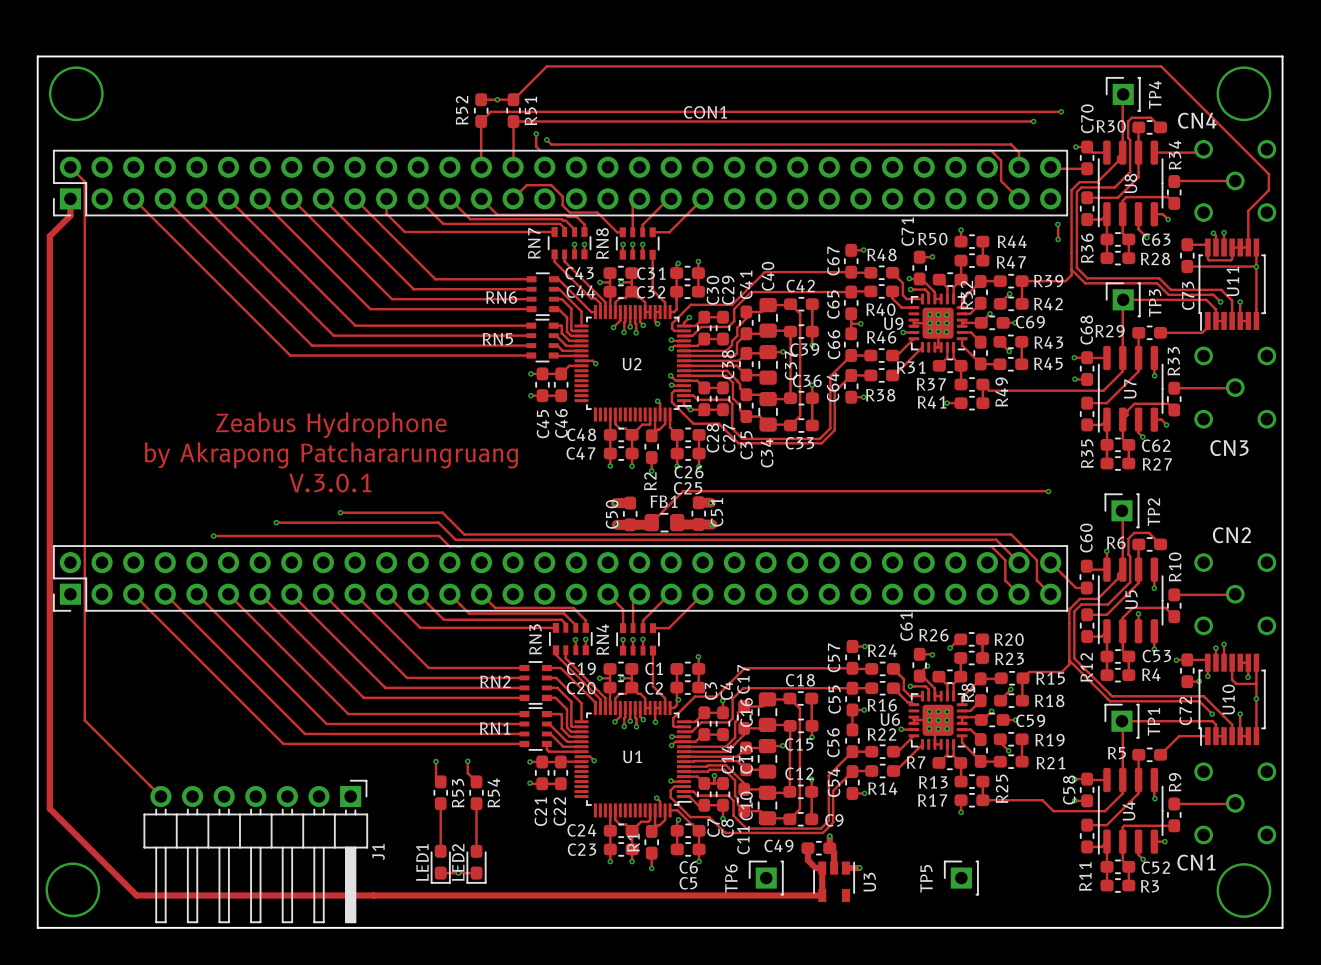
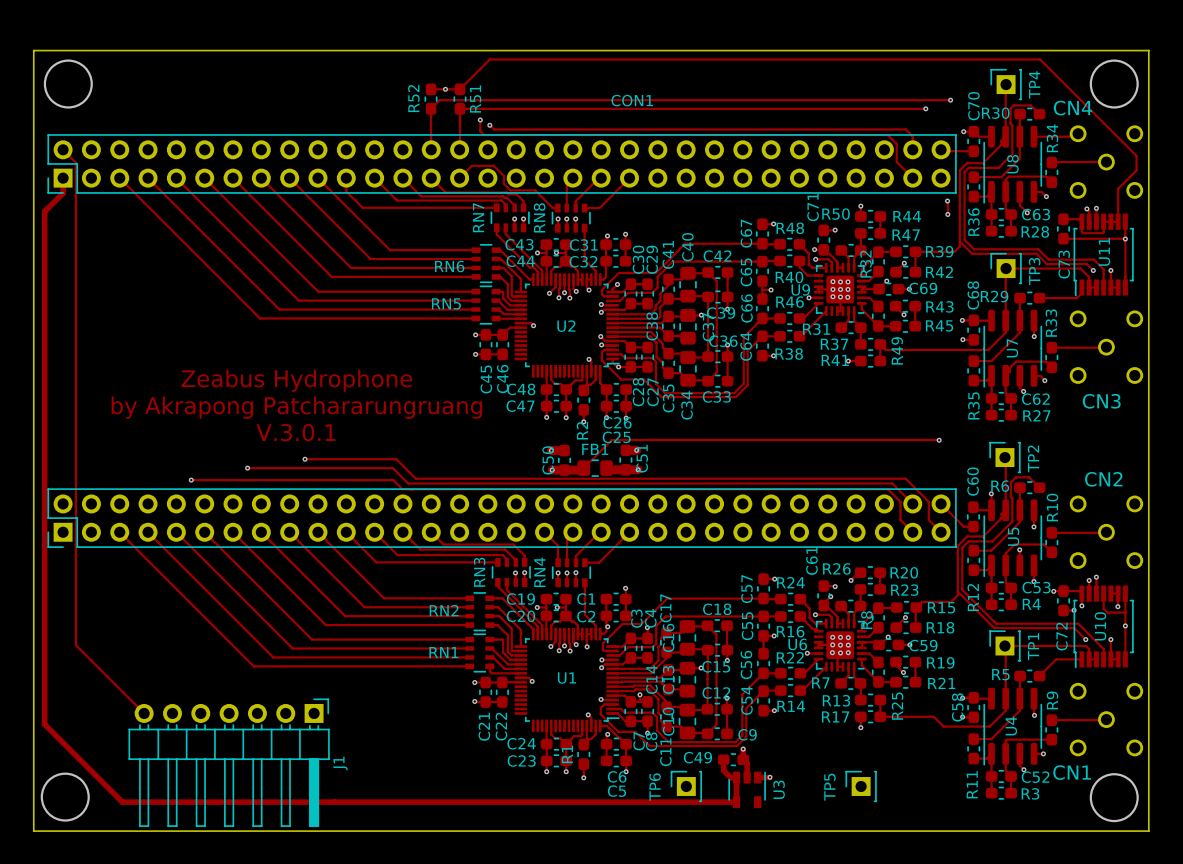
track: (436, 761) (436, 777) (440, 781) -> none
via: (436, 761) -> none
track: (467, 761) (467, 773) (476, 781) -> none
via: (467, 761) -> none
R53: (440, 792) -> none
R54: (476, 792) -> none
track: (440, 803) (440, 851) -> none
track: (476, 803) (476, 851) -> none
LED1: (440, 864) -> none
LED2: (476, 864) -> none
track: (440, 873) (476, 873) -> none
via: (458, 873) -> none

